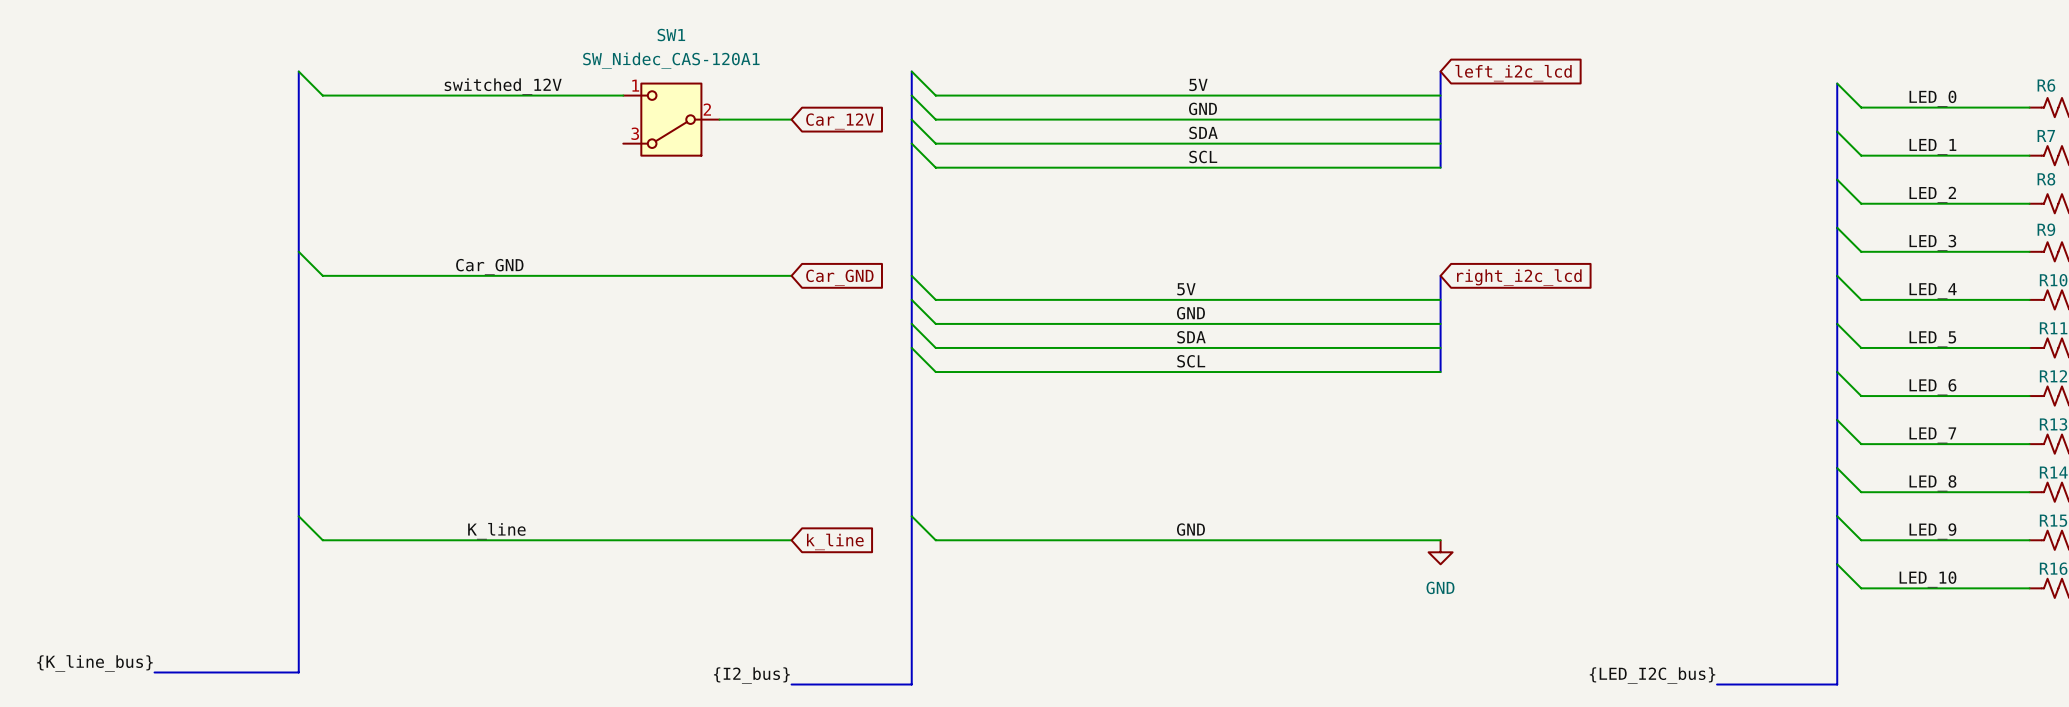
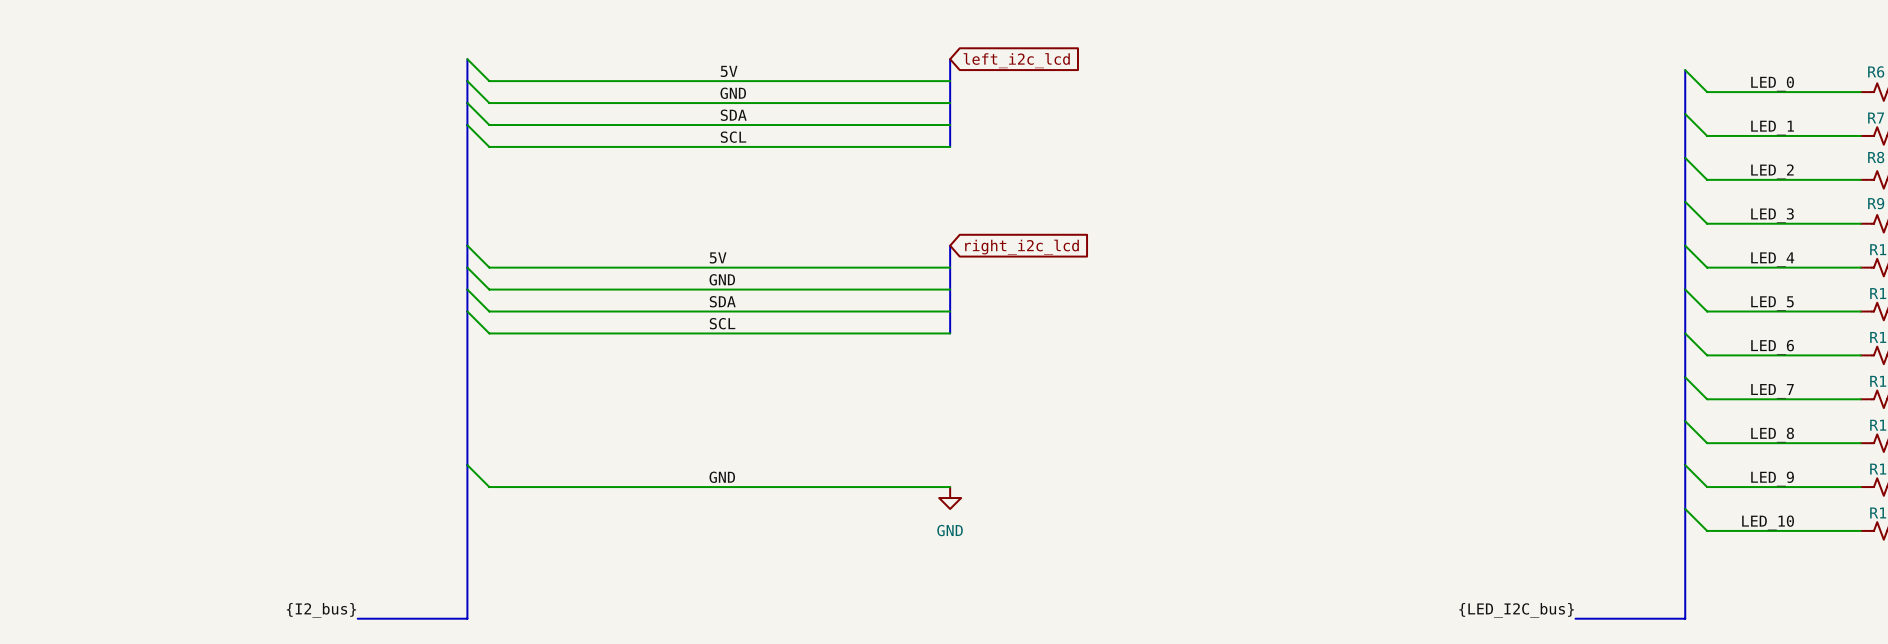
wire: (298, 71) (322, 95) (527, 95) -> (467, 59) (489, 81)
bus: (298, 71) (298, 672) (154, 672) -> none
bus: none -> (467, 59) (467, 618) (357, 618)
wire: (911, 71) (935, 95) -> (577, 81) (862, 81)
bus: (911, 71) (911, 684) (791, 684) -> none
bus: none -> (950, 59) (950, 146)
bus: (1440, 71) (1440, 167) -> none
global label: none -> left_i2c_lcd (1016, 60)
global label: left_i2c_lcd (1513, 73) -> none
label: none -> 5V (729, 71)
label: 5V (1198, 84) -> none
label: switched_12V (503, 86) -> none
wire: none -> (467, 81) (489, 103) (664, 103)
wire: (911, 95) (935, 119) -> (730, 103) (862, 103)
wire: (1031, 95) (1440, 95) -> none
label: none -> GND (733, 93)
label: GND (1202, 108) -> none
SW1: SW_Nidec_CAS-120A1 (671, 119) -> none
wire: (911, 119) (935, 143) -> (467, 103) (489, 125) (862, 125)
wire: (1031, 119) (1440, 119) -> none
global label: Car_12V (840, 121) -> none
label: none -> SDA (733, 115)
label: SDA (1203, 132) -> none
wire: (911, 143) (935, 167) -> (467, 125) (489, 146) (862, 146)
wire: (1031, 143) (1440, 143) -> none
label: none -> SCL (733, 137)
label: SCL (1203, 156) -> none
wire: (1031, 167) (1440, 167) -> none
wire: (298, 251) (322, 275) (791, 275) -> none
label: Car_GND (489, 266) -> none
wire: (911, 275) (935, 299) -> (467, 245) (489, 267) (862, 267)
bus: none -> (950, 245) (950, 333)
bus: (1440, 275) (1440, 372) -> none
global label: Car_GND (839, 277) -> none
global label: none -> right_i2c_lcd (1022, 247)
global label: right_i2c_lcd (1519, 277) -> none
label: none -> 5V (718, 257)
label: 5V (1186, 289) -> none
wire: (911, 299) (935, 323) -> (467, 267) (489, 289) (862, 289)
wire: (1031, 299) (1440, 299) -> none
label: none -> GND (722, 279)
label: GND (1190, 313) -> none
wire: (911, 323) (935, 347) -> (467, 289) (489, 311) (862, 311)
wire: (1031, 323) (1440, 323) -> none
label: none -> SDA (722, 301)
label: SDA (1191, 337) -> none
wire: (911, 347) (935, 372) -> (467, 311) (489, 333) (862, 333)
wire: (1031, 347) (1440, 347) -> none
label: none -> SCL (722, 323)
label: SCL (1191, 361) -> none
wire: (1031, 372) (1440, 372) -> none
wire: (298, 516) (322, 540) (527, 540) -> (467, 465) (489, 487)
wire: (911, 516) (935, 540) -> (730, 487) (862, 487)
label: none -> GND (722, 477)
label: GND (1190, 529) -> none
label: K_line (496, 531) -> none
wire: (1031, 540) (1440, 540) -> none
global label: k_line (835, 541) -> none
power symbol: none -> GND (950, 498)
power symbol: GND (1440, 552) -> none
label: {K_line_bus} (94, 663) -> none
label: none -> {I2_bus} (321, 610)
label: {I2_bus} (751, 675) -> none

